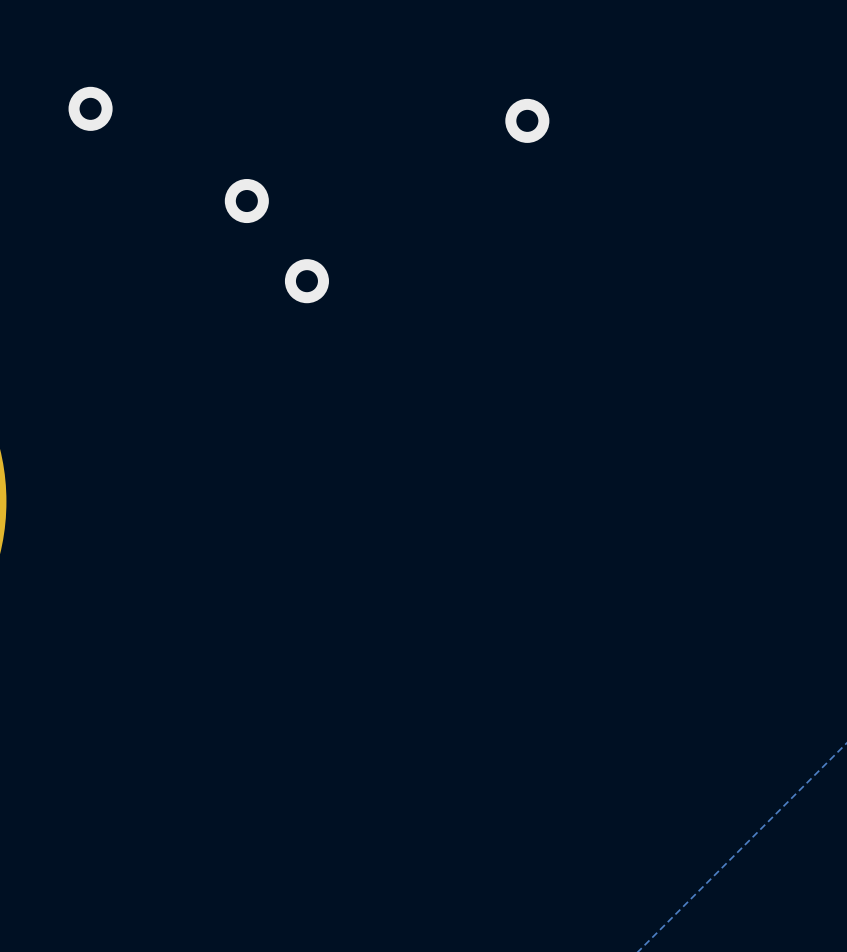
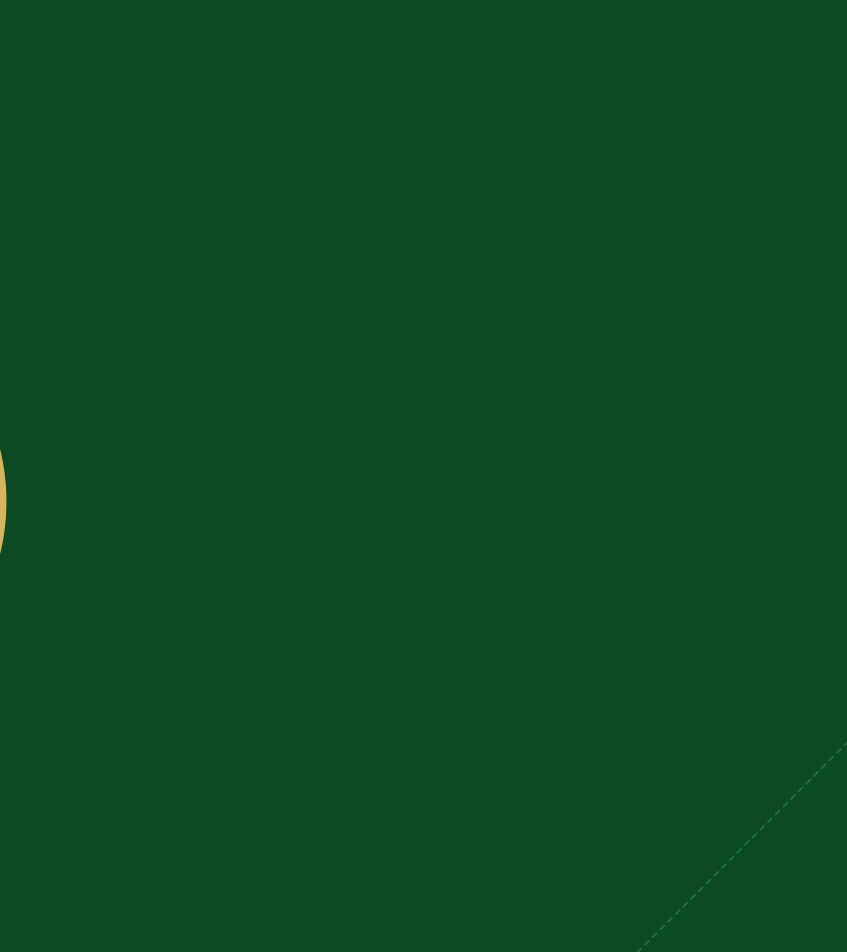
via: (90, 108) -> none
via: (527, 120) -> none
via: (246, 201) -> none
via: (306, 281) -> none

